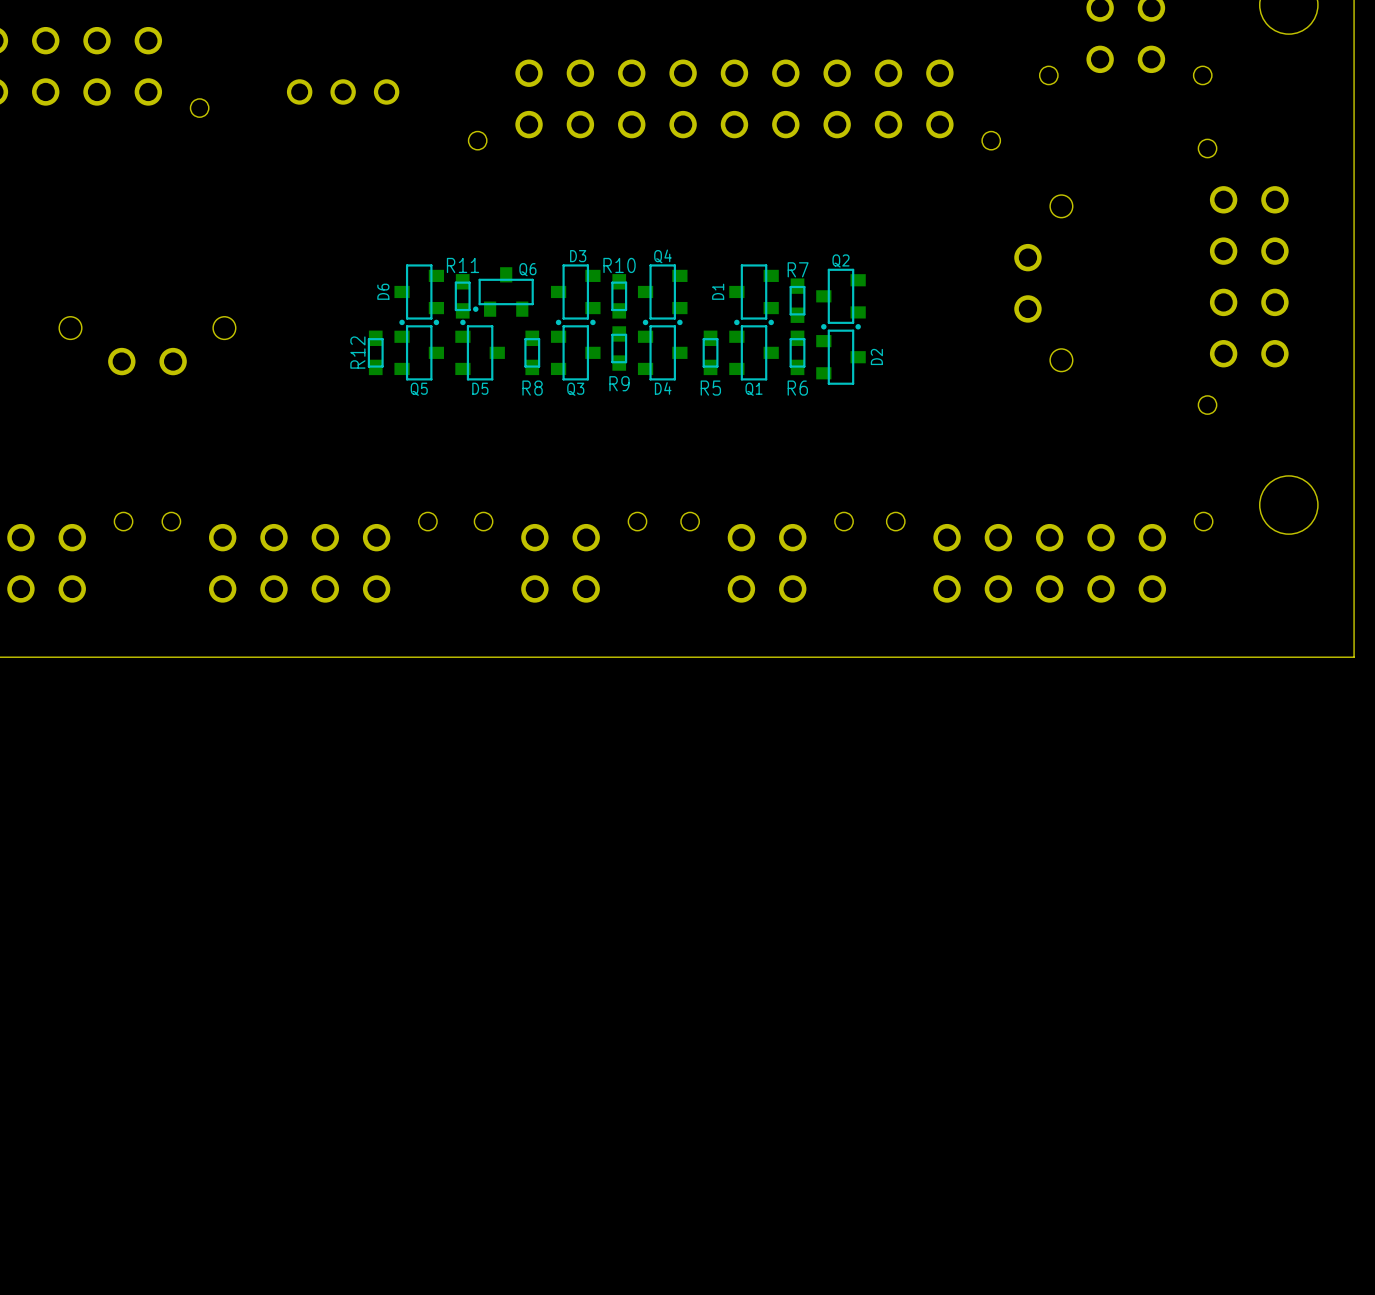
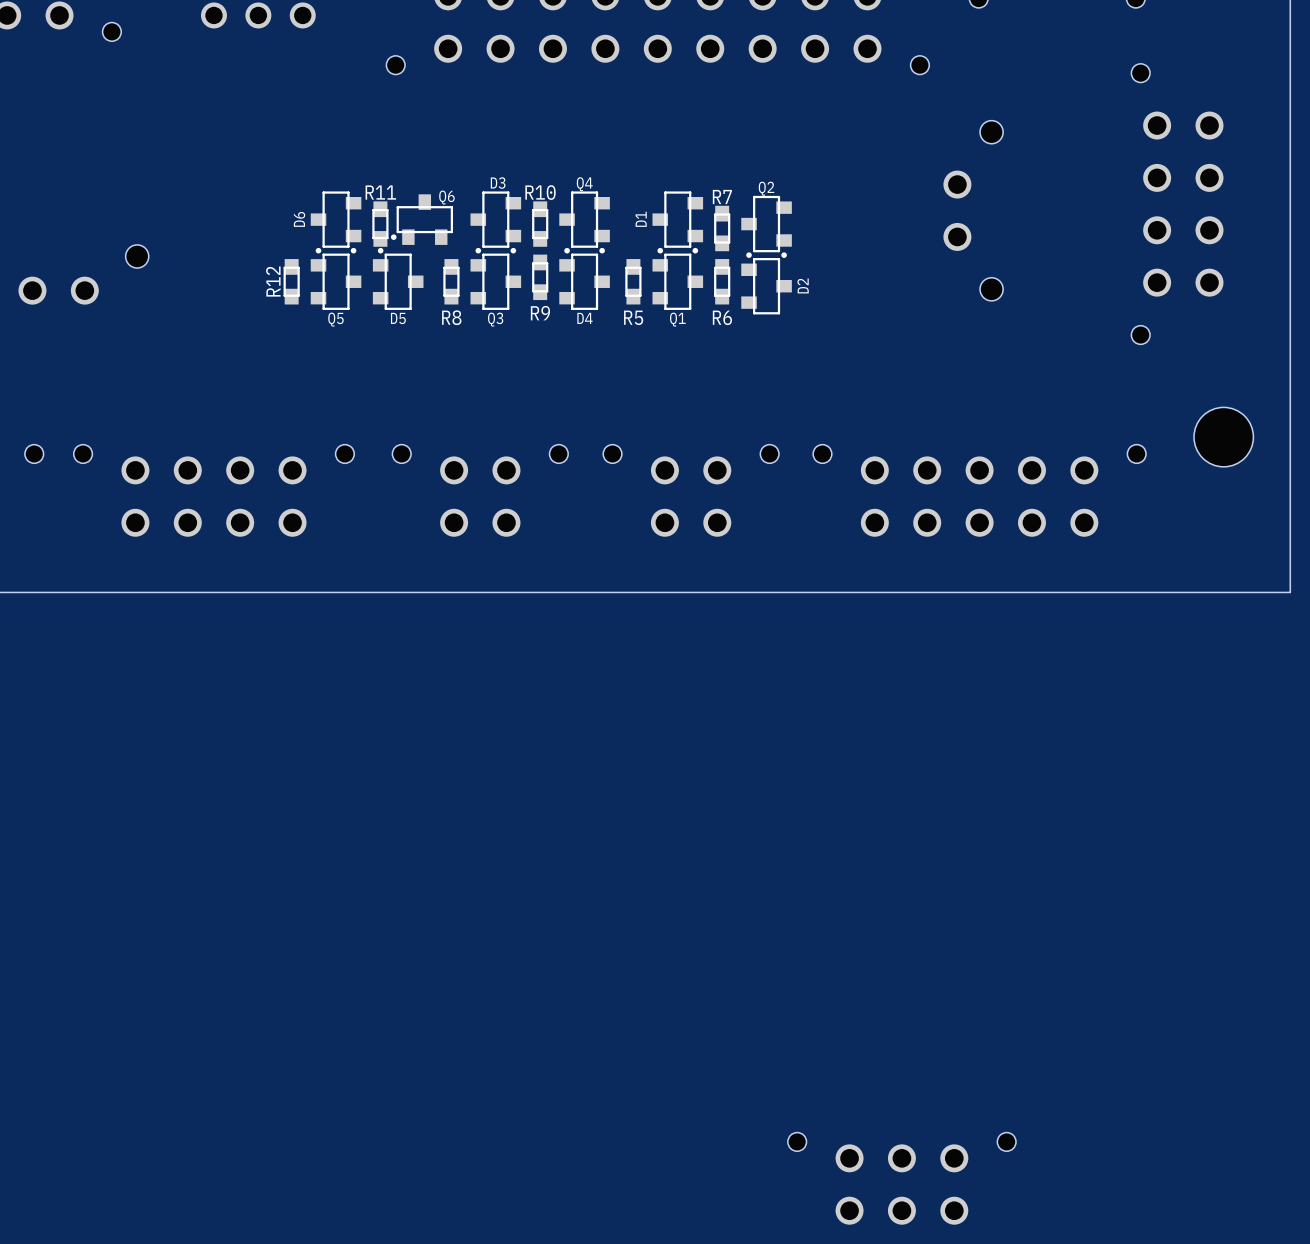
part: none -> (901, 1178)

